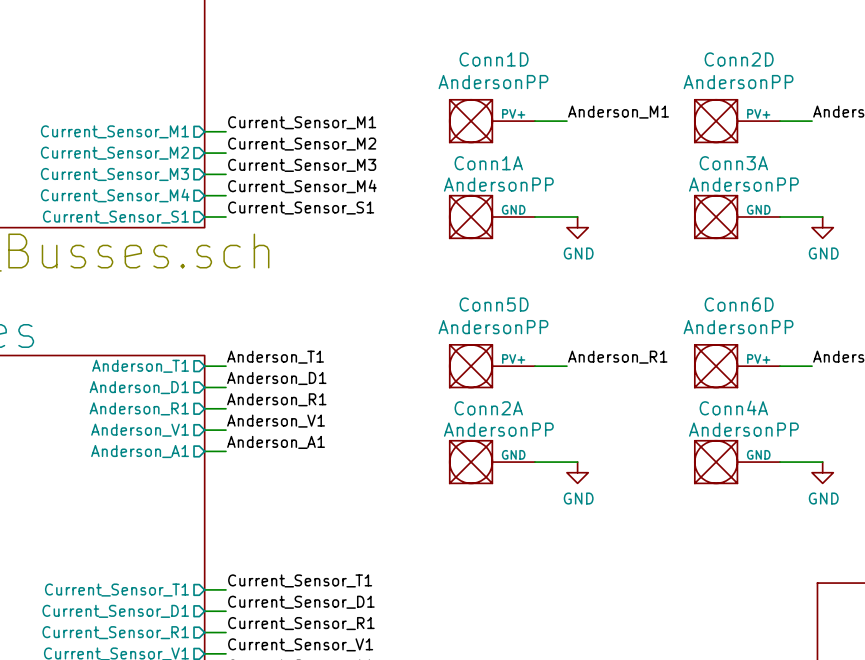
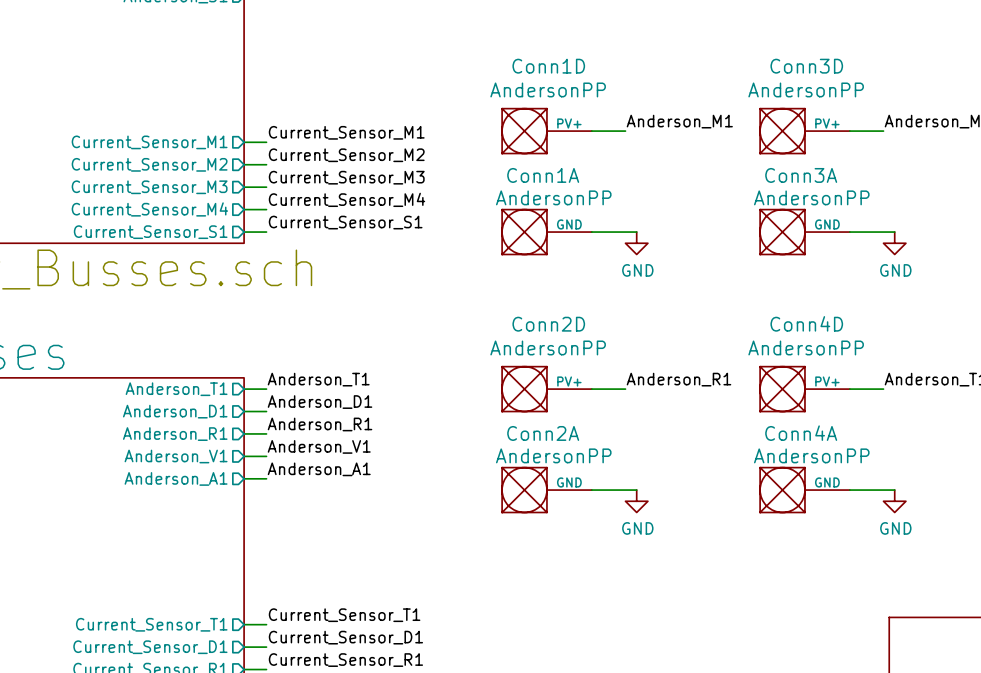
Conn2D name: Conn2D (739, 59) -> Conn3D (806, 66)
Conn5D name: Conn5D (494, 304) -> Conn2D (548, 324)
Conn6D name: Conn6D (739, 304) -> Conn4D (806, 323)

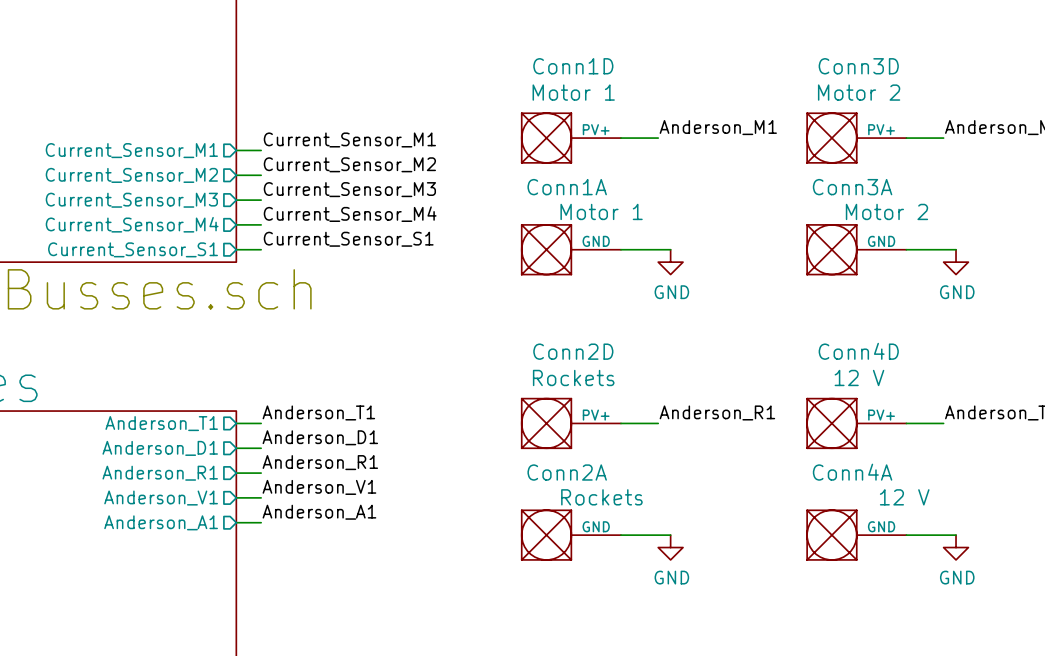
Conn1D value: AndersonPP (548, 89) -> Motor 1 (573, 92)
Conn3D value: AndersonPP (806, 89) -> Motor 2 (859, 92)
Conn1A value: AndersonPP (553, 197) -> Motor 1 (601, 211)
Conn3A value: AndersonPP (811, 197) -> Motor 2 (886, 211)
Conn2D value: AndersonPP (548, 347) -> Rockets (573, 377)
Conn4D value: AndersonPP (806, 347) -> 12 V (859, 377)
Conn2A value: AndersonPP (553, 455) -> Rockets (601, 497)
Conn4A value: AndersonPP (811, 455) -> 12 V (904, 497)

